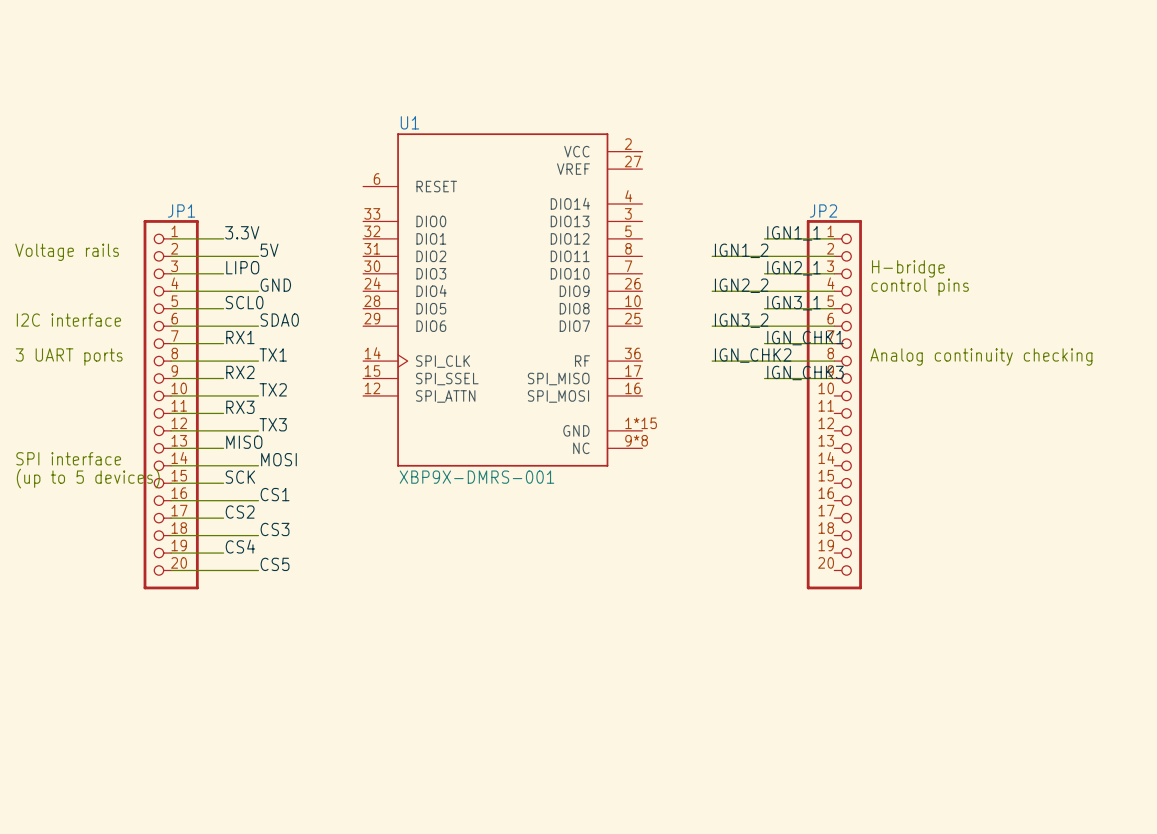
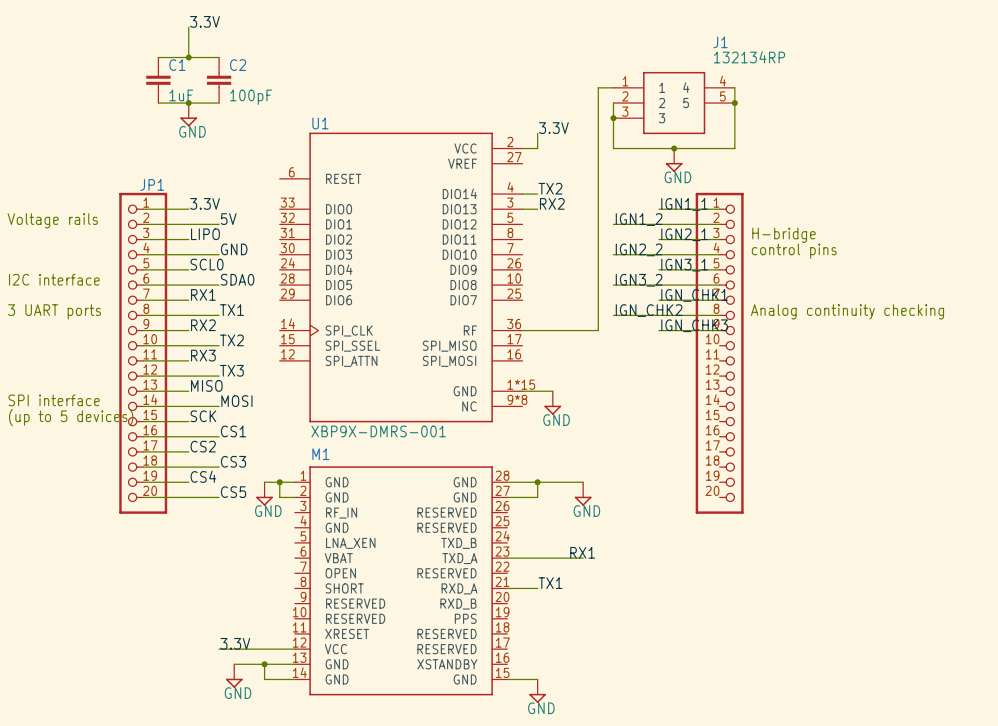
label: none -> 3.3V (204, 21)
wire: none -> (188, 27) (188, 57)
wire: none -> (158, 57) (219, 57)
junction: none -> (188, 57)
C1: none -> 1uF (158, 80)
C2: none -> 100pF (219, 80)
wire: none -> (613, 87) (598, 87) (598, 330) (522, 330)
wire: none -> (734, 87) (734, 148) (613, 148) (613, 103)
wire: none -> (158, 103) (219, 103)
junction: none -> (188, 103)
J1: none -> 132134RP (674, 103)
junction: none -> (734, 103)
power symbol: none -> GND (188, 114)
junction: none -> (613, 118)
label: none -> 3.3V (553, 128)
junction: none -> (674, 148)
power symbol: none -> GND (674, 160)
JP2 name: JP2 (823, 210) -> none
label: none -> TX2 (550, 188)
label: none -> RX2 (552, 203)
U1 position: (502, 299) -> (401, 277)
power symbol: none -> GND (552, 403)
wire: none -> (264, 482) (294, 482)
wire: none -> (279, 482) (279, 497) (294, 497)
junction: none -> (279, 482)
wire: none -> (507, 482) (583, 482)
wire: none -> (537, 482) (537, 497) (507, 497)
junction: none -> (537, 482)
power symbol: none -> GND (264, 494)
power symbol: none -> GND (583, 494)
label: none -> RX1 (582, 552)
wire: none -> (507, 558) (583, 558)
M1: none -> (401, 580)
label: none -> TX1 (550, 583)
wire: none -> (507, 588) (537, 588)
label: none -> 3.3V (235, 643)
wire: none -> (219, 649) (294, 649)
wire: none -> (234, 664) (294, 664)
wire: none -> (264, 664) (264, 679) (294, 679)
junction: none -> (264, 664)
power symbol: none -> GND (234, 676)
wire: none -> (507, 679) (537, 679)
power symbol: none -> GND (537, 691)

